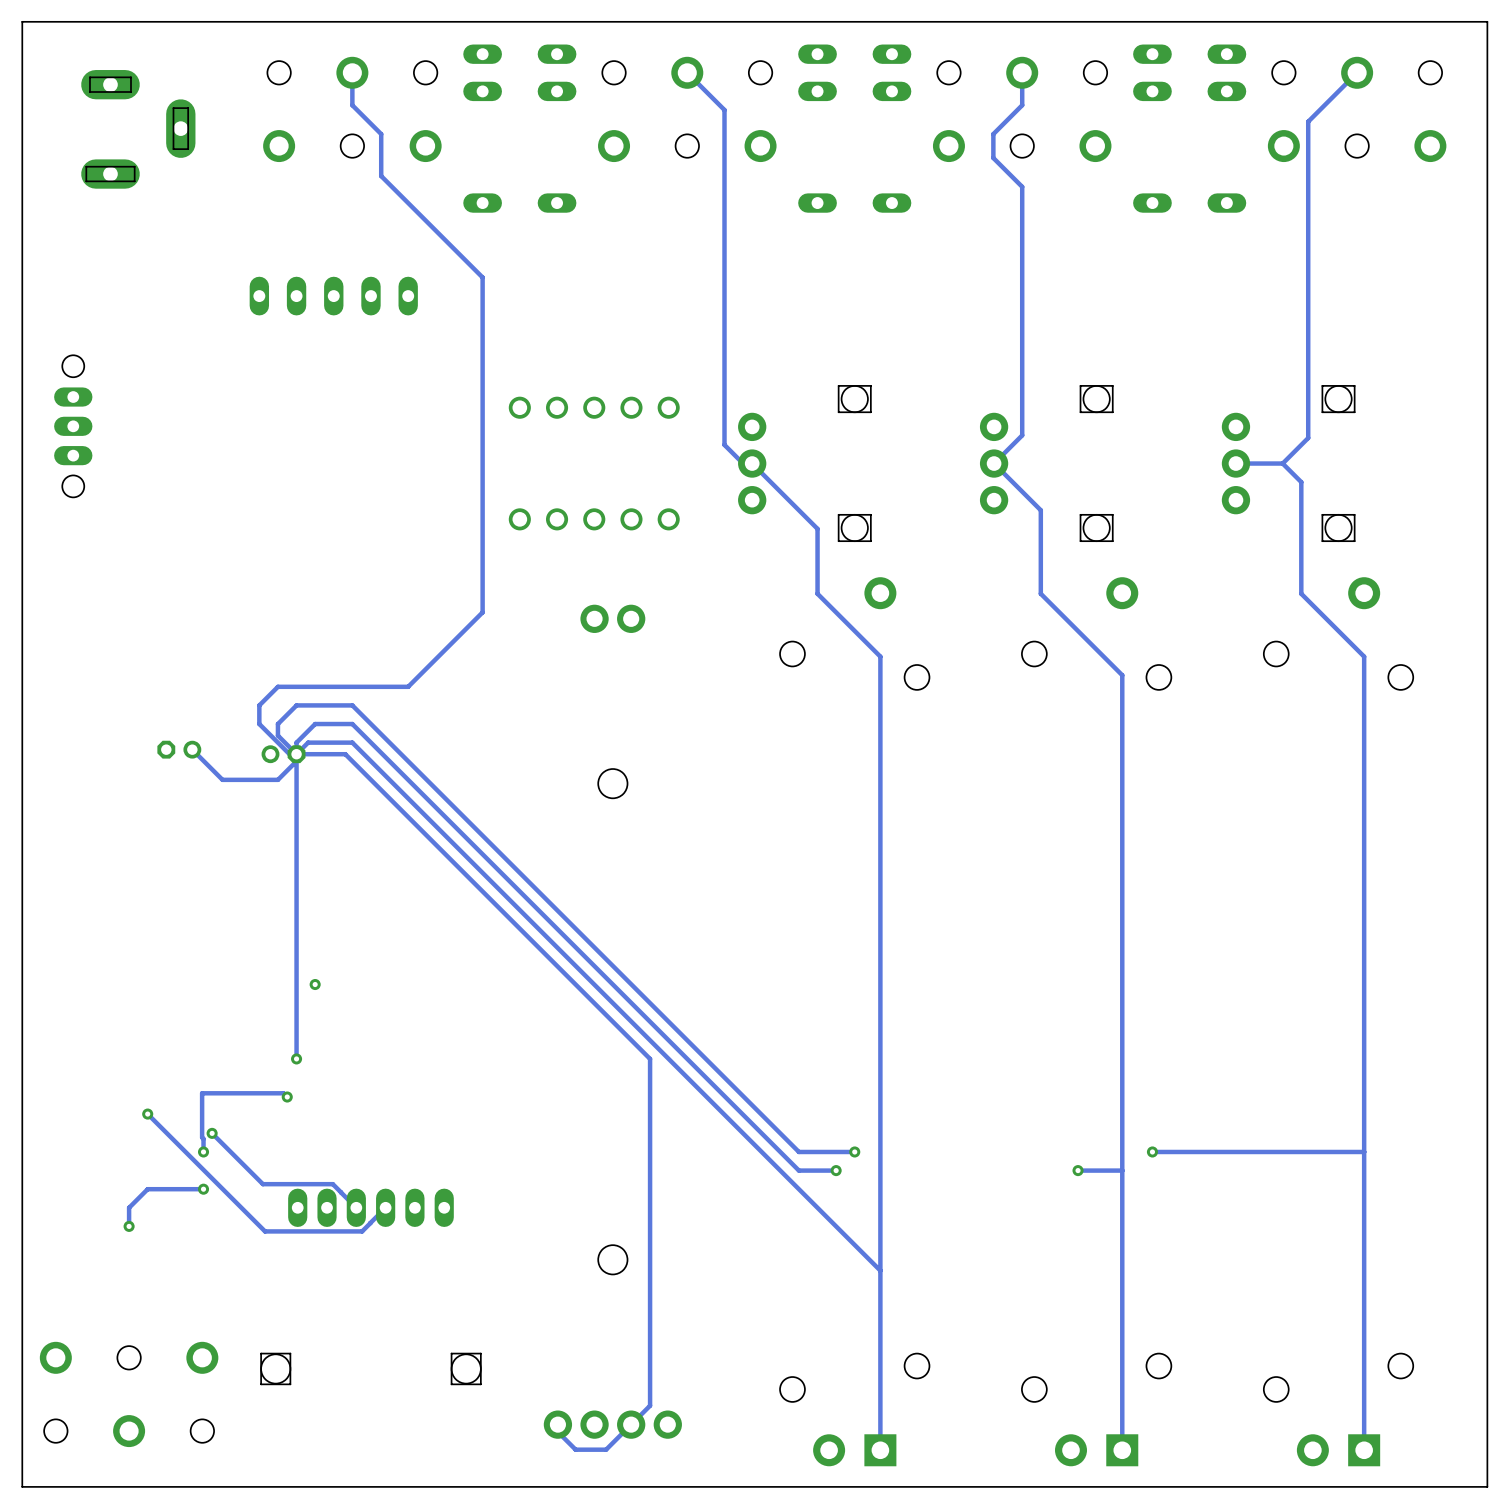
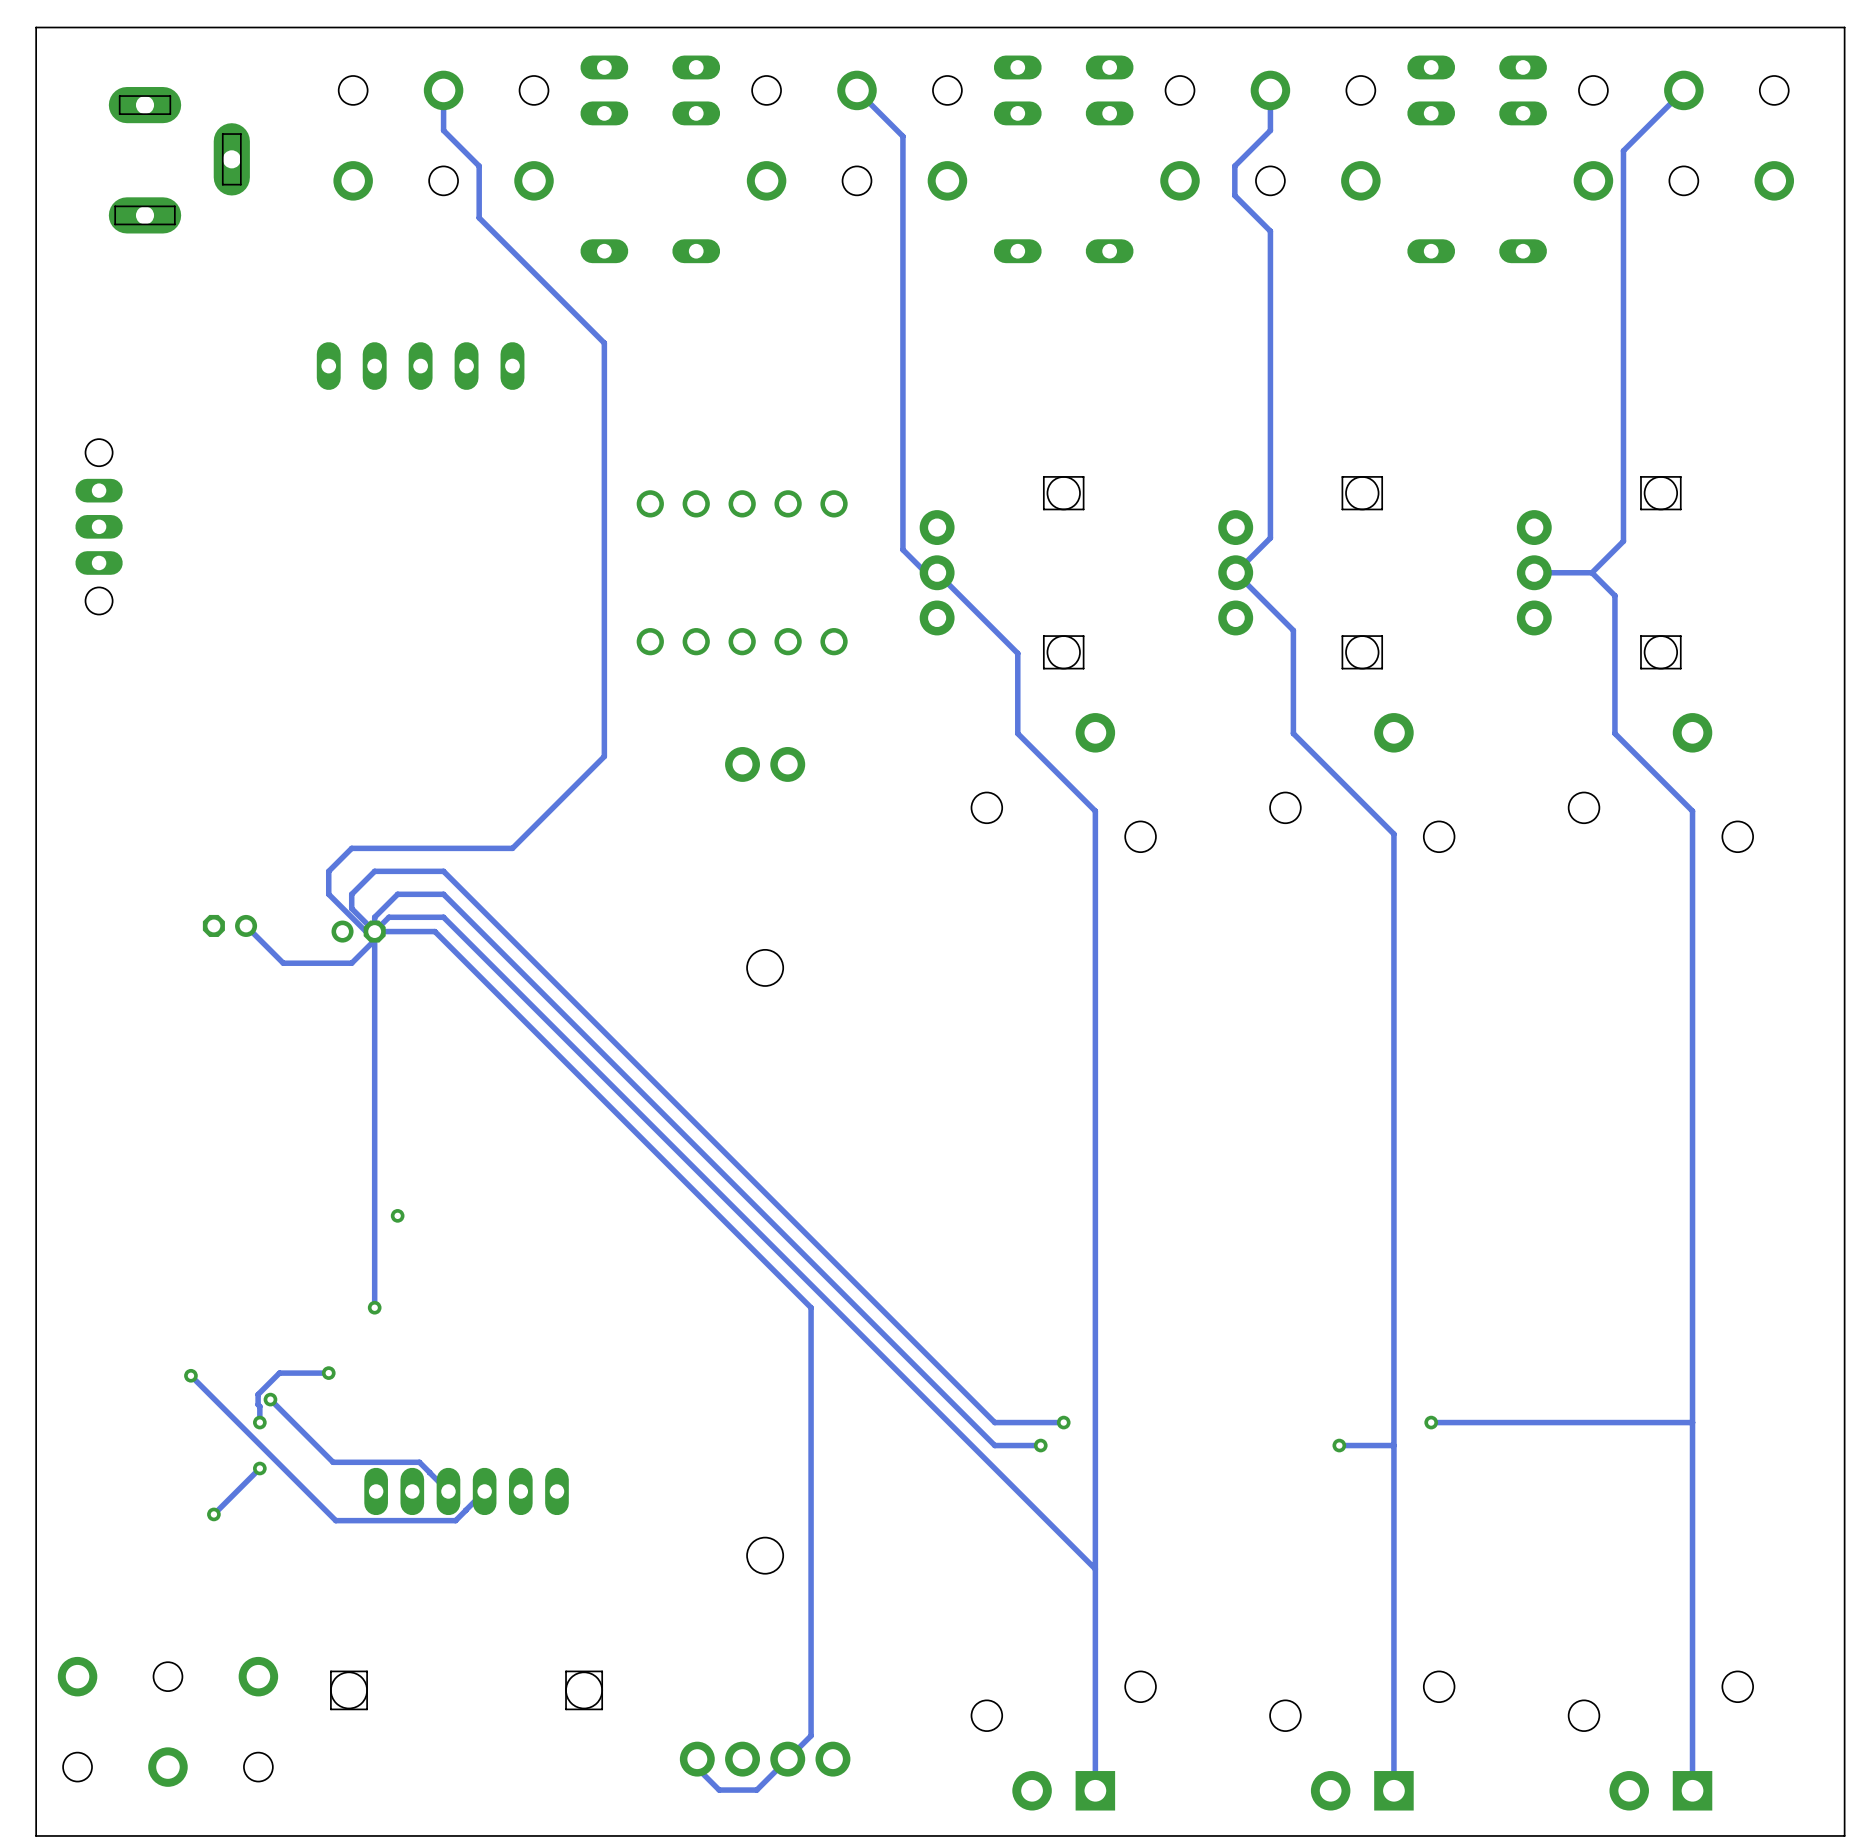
track: (287, 1097) (283, 1093) (202, 1093) (202, 1129) -> (328, 1373) (279, 1373) (258, 1394)
via position: (287, 1097) -> (328, 1373)
track: (203, 1189) (147, 1189) (129, 1207) (129, 1226) -> (259, 1468) (213, 1514)
via position: (129, 1226) -> (213, 1514)

